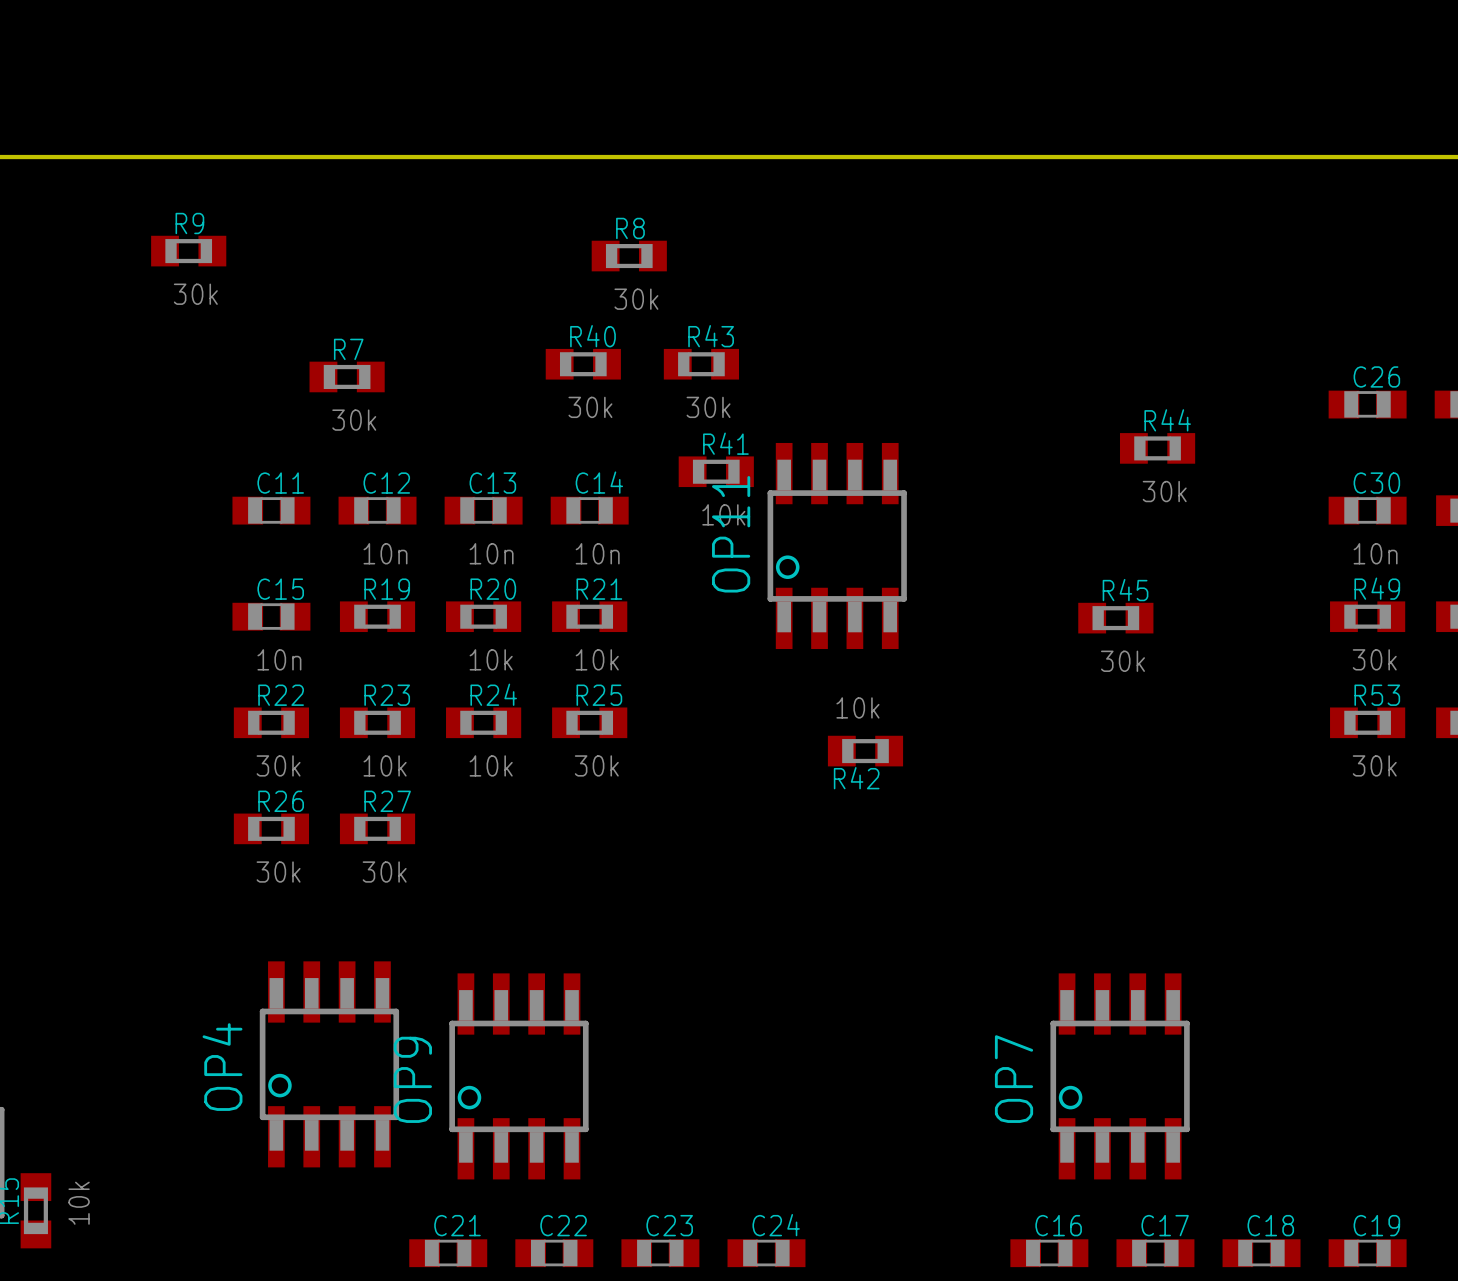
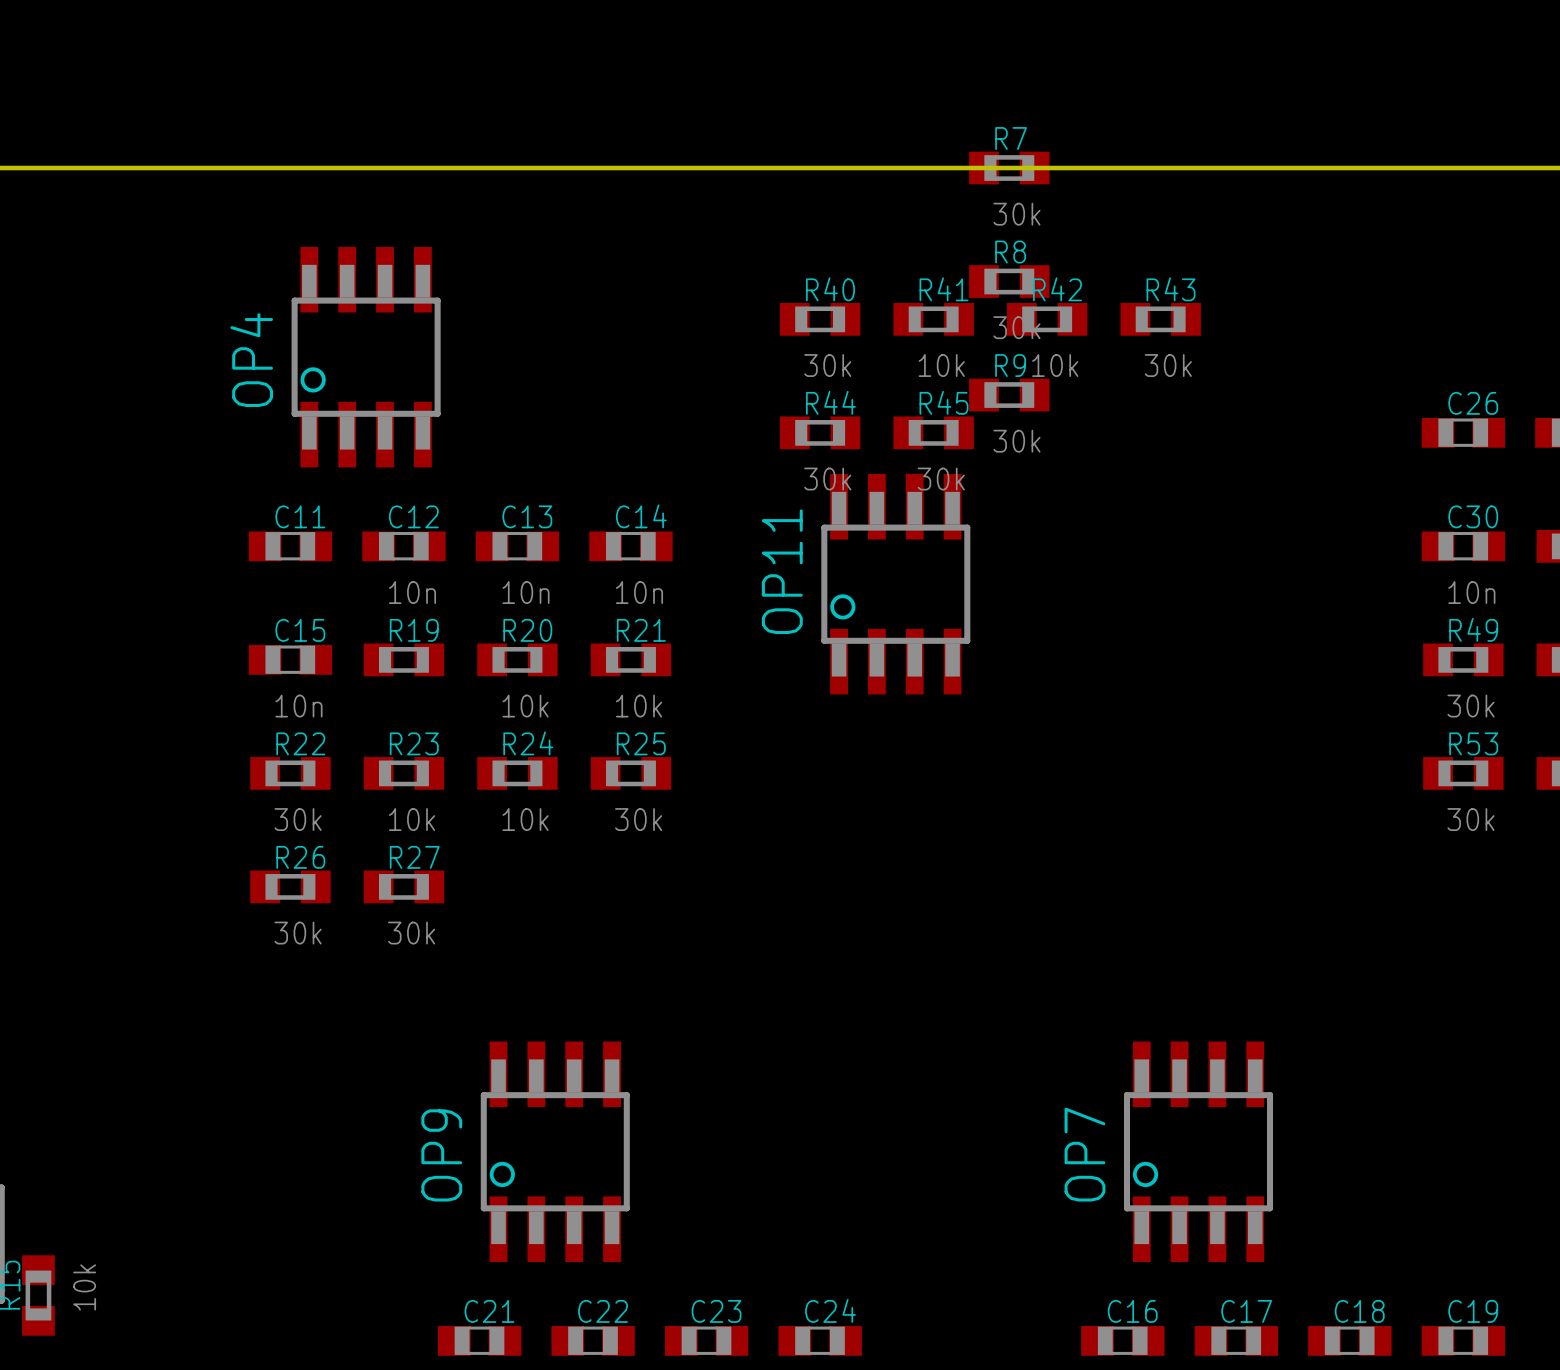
R9 position: (188, 251) -> (1009, 395)
R8 position: (629, 256) -> (1009, 281)
R40 position: (583, 364) -> (820, 319)
R43 position: (701, 364) -> (1160, 319)
R7 position: (347, 376) -> (1009, 168)
R44 position: (1157, 448) -> (820, 432)
R41 position: (716, 471) -> (933, 319)
R45 position: (1115, 618) -> (933, 432)
R42 value position: 10k (857, 707) -> 10k (1055, 365)
R42 position: (865, 751) -> (1047, 319)
R42 name position: R42 (856, 778) -> R42 (1057, 289)
OP4 position: (329, 1064) -> (366, 357)

